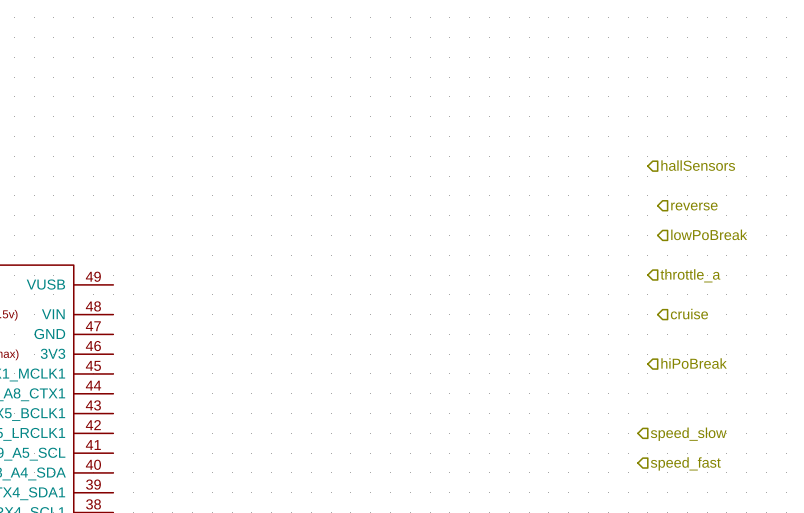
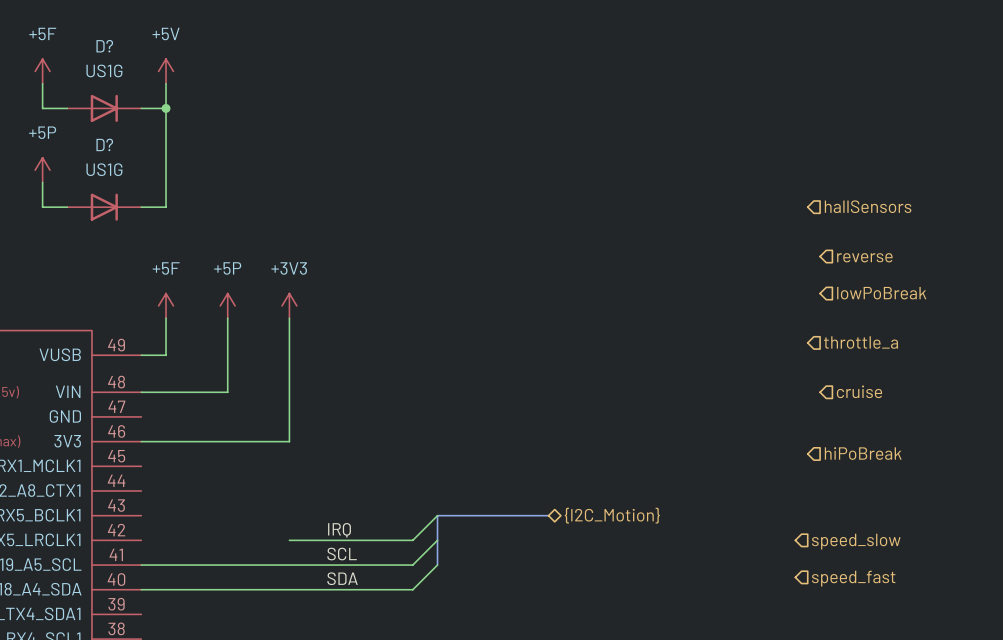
power symbol: none -> +5F (42, 71)
power symbol: none -> +5V (166, 71)
wire: none -> (42, 83) (42, 108) (67, 108)
wire: none -> (166, 83) (166, 207) (141, 207)
D?: none -> US1G (104, 108)
wire: none -> (141, 108) (166, 108)
junction: none -> (166, 108)
power symbol: none -> +5P (42, 170)
wire: none -> (42, 182) (42, 207) (67, 207)
D?: none -> US1G (104, 207)
power symbol: none -> +5F (166, 305)
power symbol: none -> +5P (227, 305)
power symbol: none -> +3V3 (289, 305)
wire: none -> (166, 318) (166, 355) (141, 355)
wire: none -> (227, 318) (227, 392) (141, 392)
wire: none -> (289, 318) (289, 441) (141, 441)
wire: none -> (437, 515) (412, 540) (289, 540)
bus: none -> (548, 515) (437, 515) (437, 565)
hierarchical label: none -> {I2C_Motion} (612, 515)
label: none -> IRQ (339, 530)
wire: none -> (437, 540) (412, 565) (141, 565)
label: none -> SCL (342, 554)
wire: none -> (437, 565) (412, 589) (141, 589)
label: none -> SDA (342, 578)

